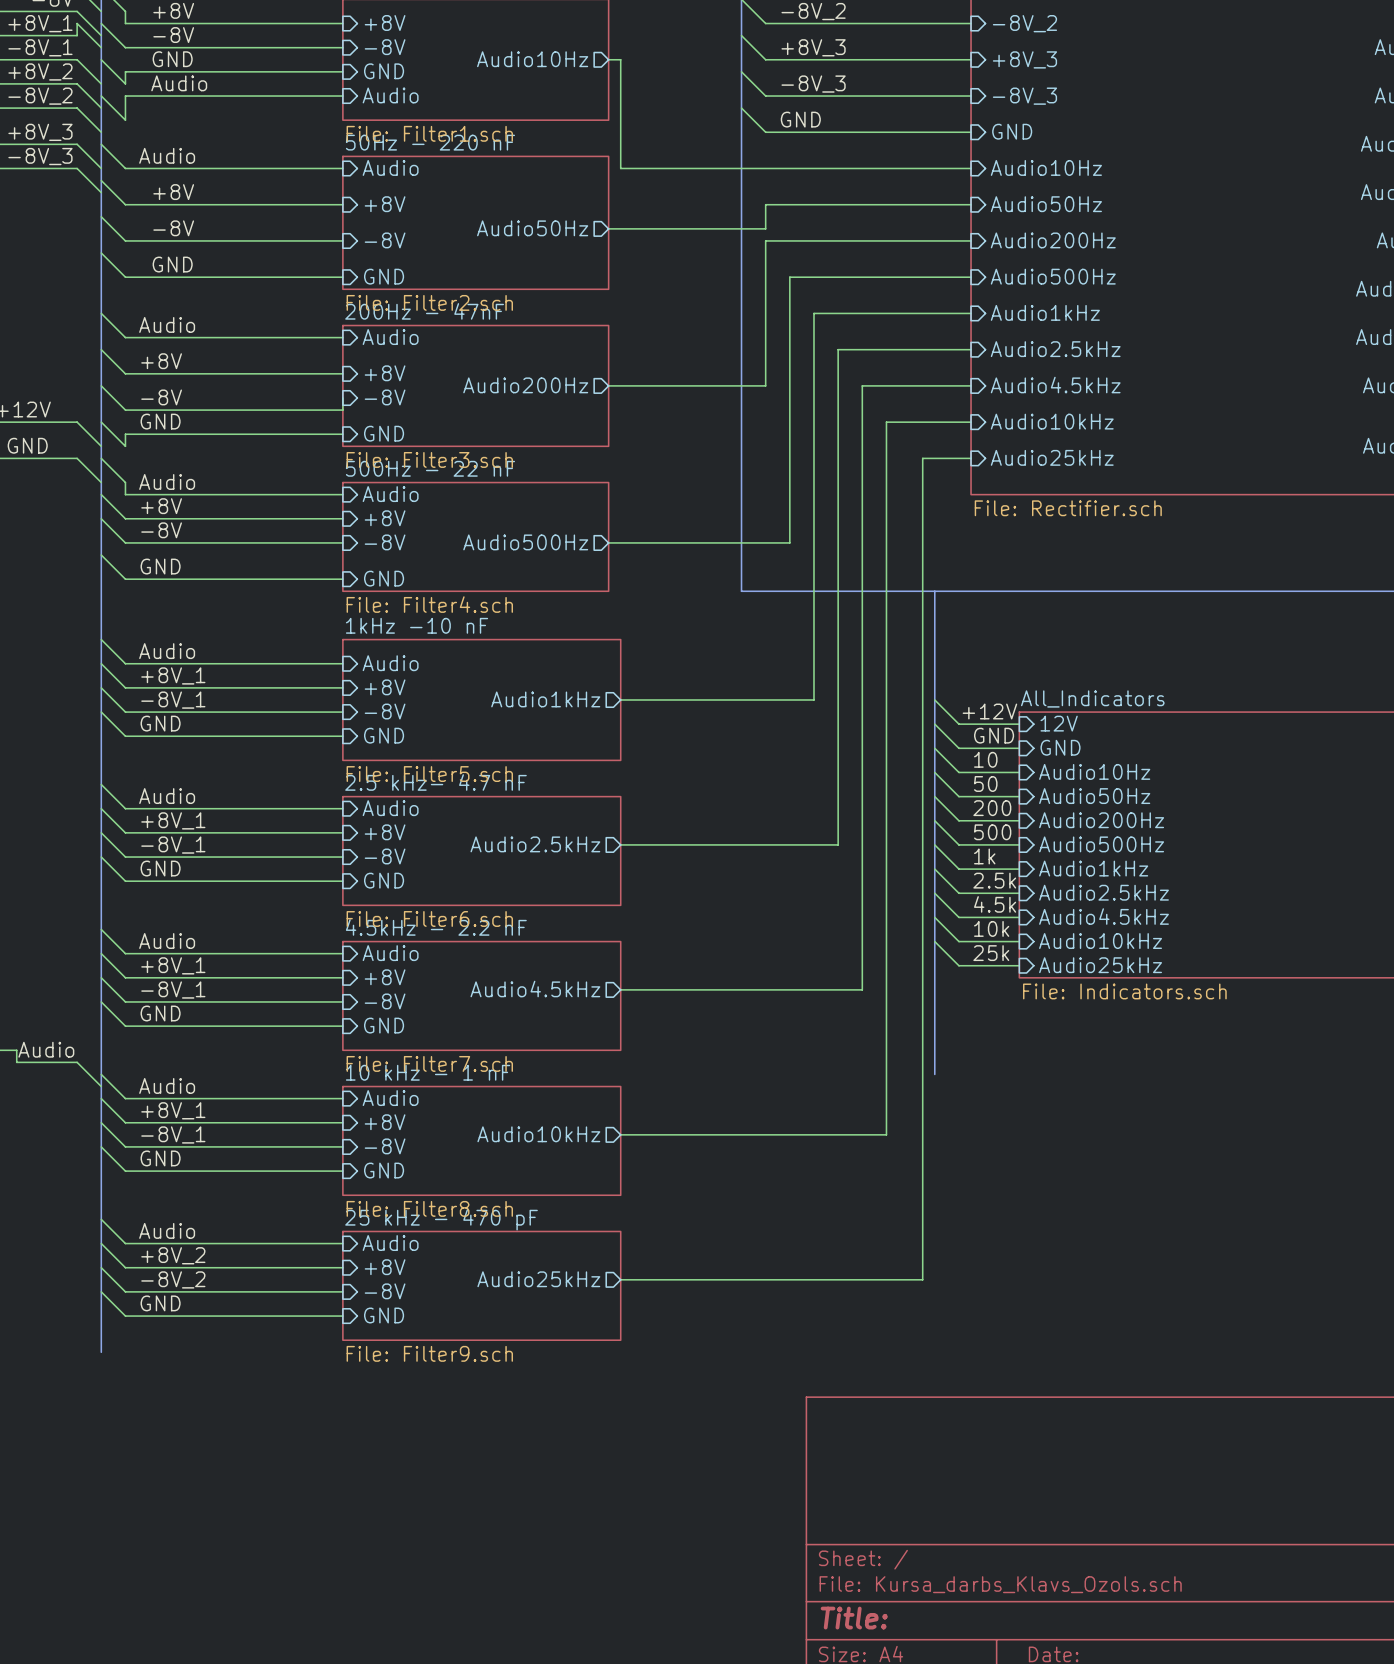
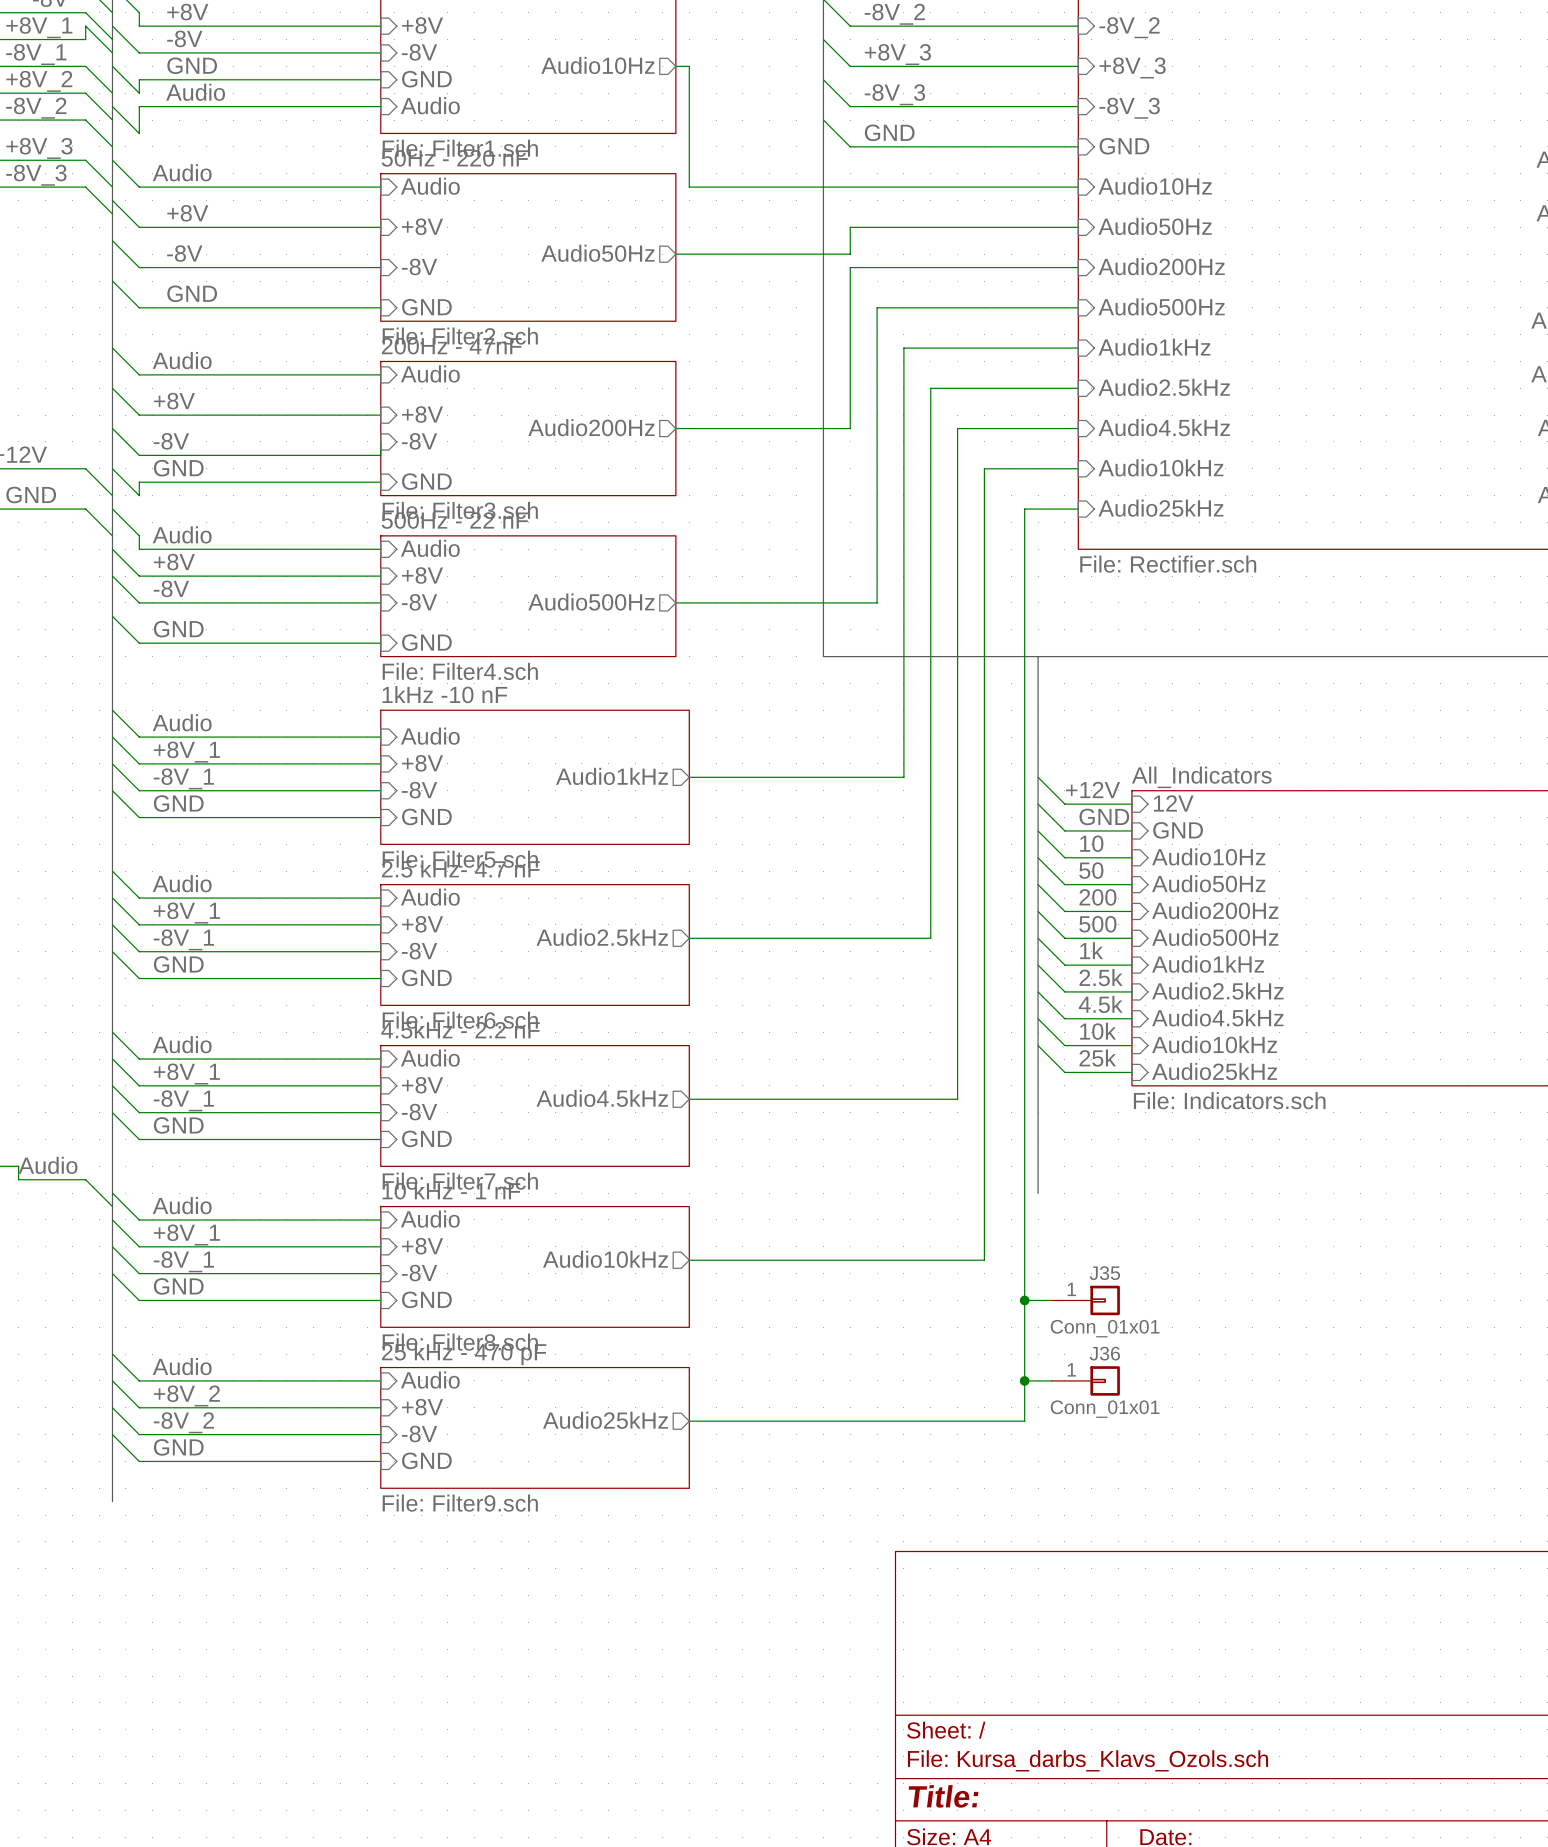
wire: none -> (1024, 1300) (1051, 1300)
junction: none -> (1024, 1300)
J35: none -> Conn_01x01 (1085, 1300)
wire: none -> (1024, 1380) (1051, 1380)
junction: none -> (1024, 1380)
J36: none -> Conn_01x01 (1085, 1380)

